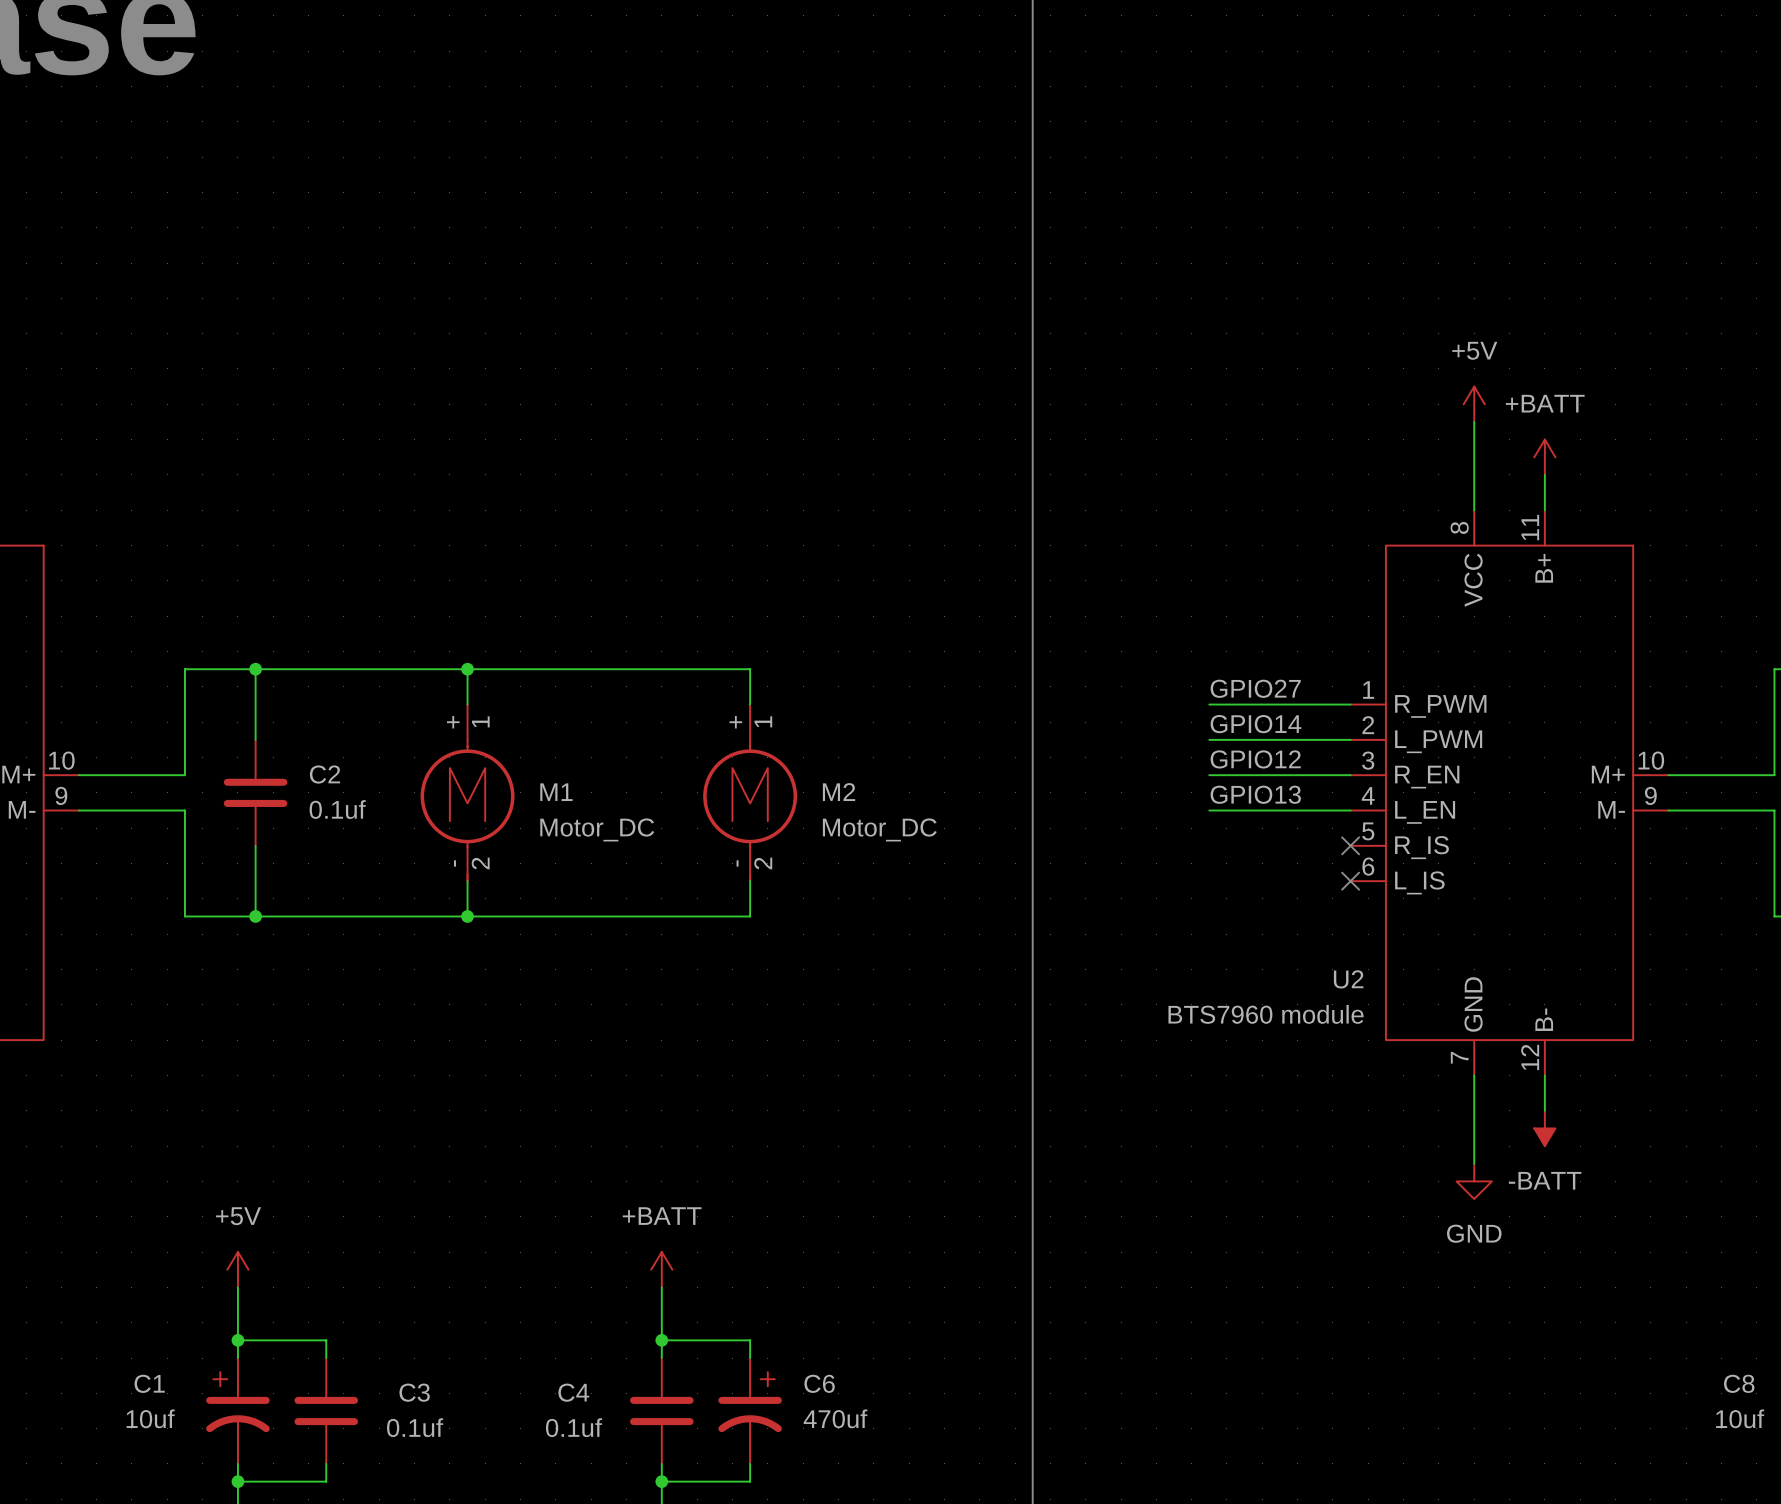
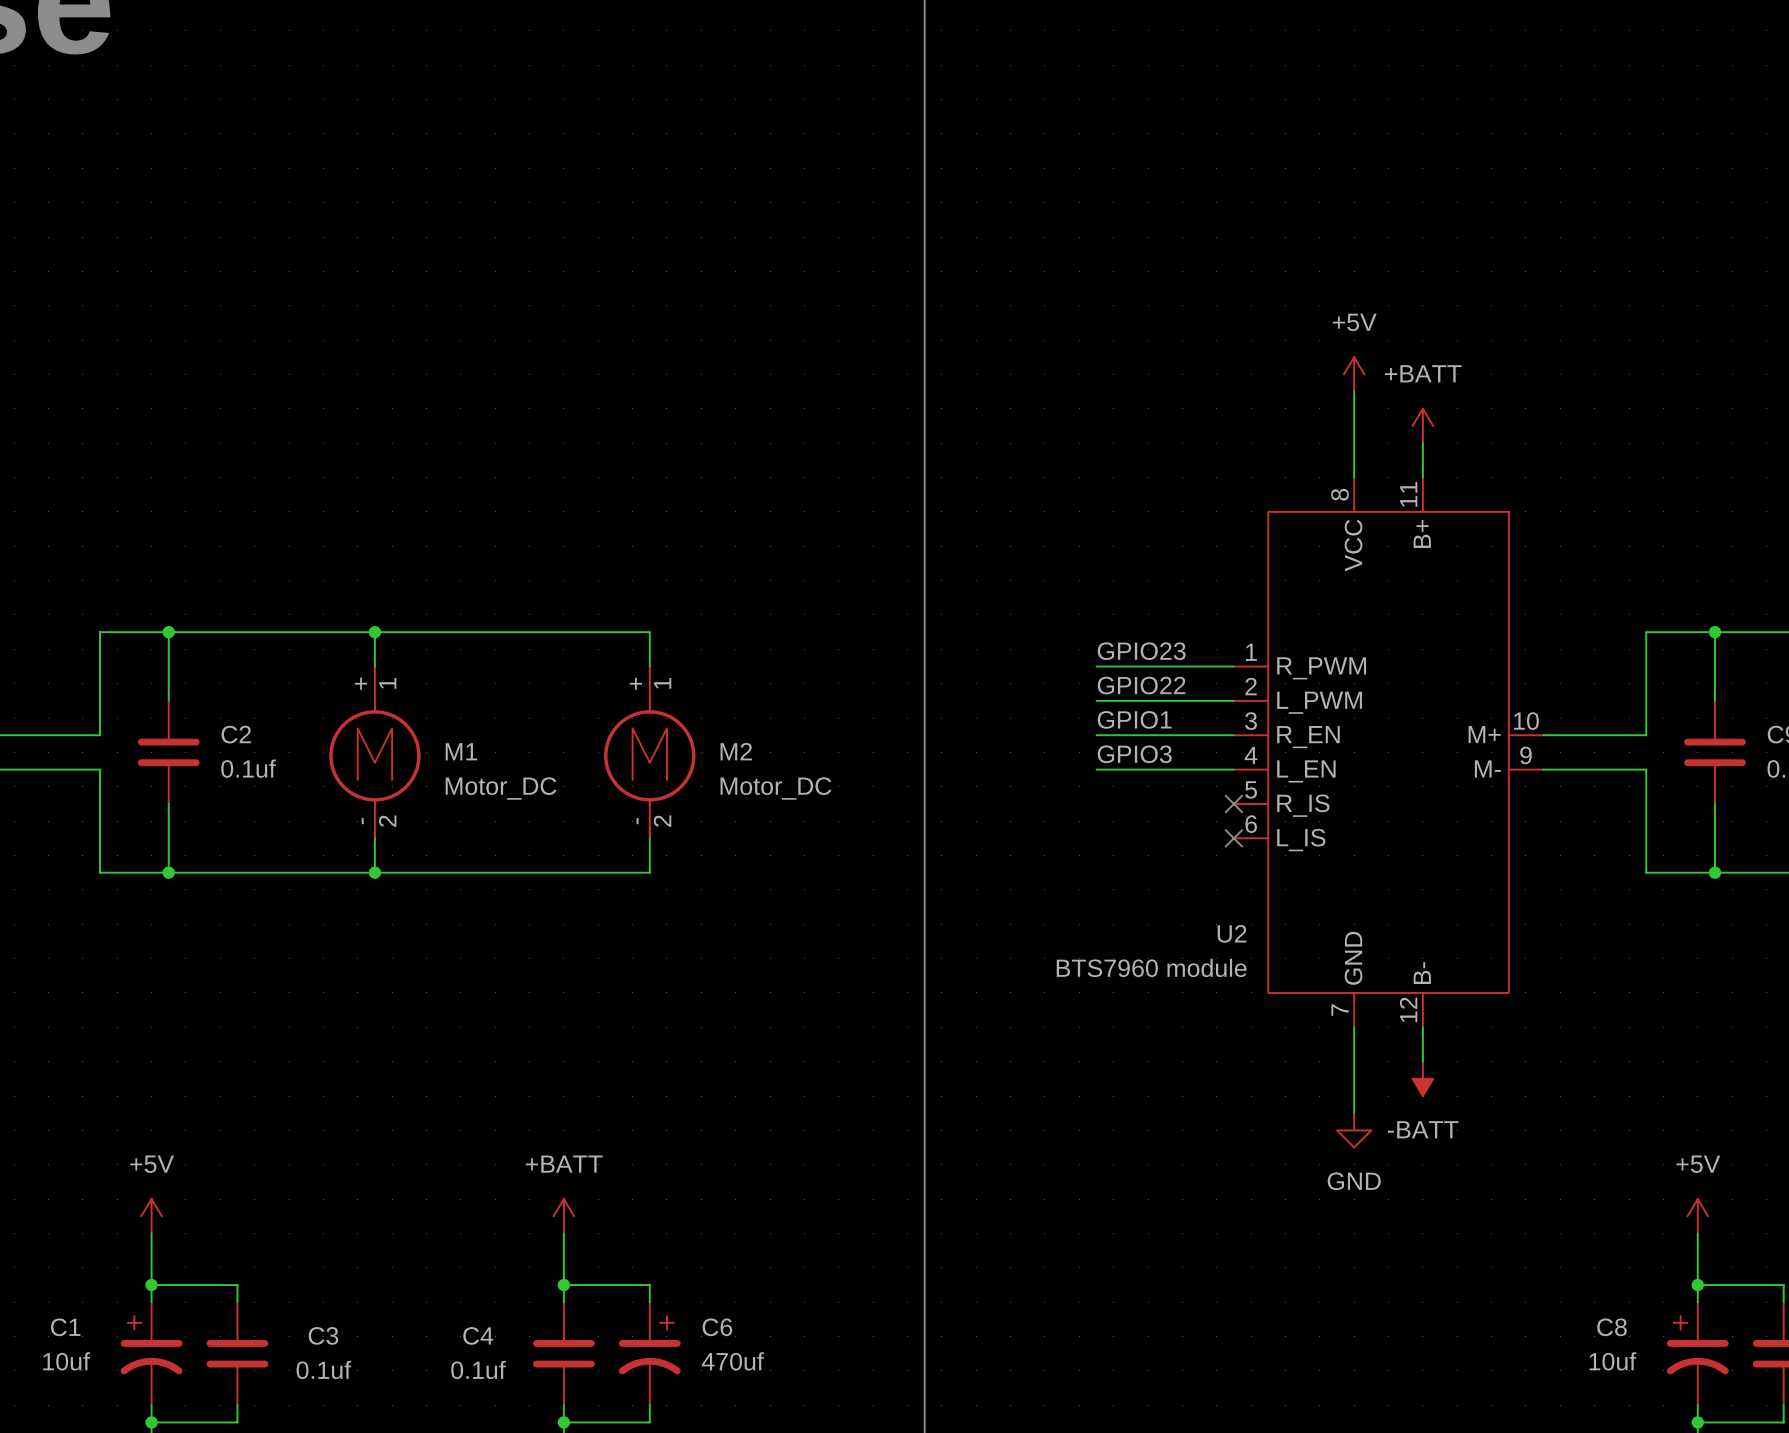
label: GPIO27 (1255, 688) -> GPIO23 (1141, 651)
label: GPIO14 (1255, 724) -> GPIO22 (1141, 685)
label: GPIO12 (1255, 759) -> GPIO1 (1134, 719)
label: GPIO13 (1255, 794) -> GPIO3 (1134, 754)

